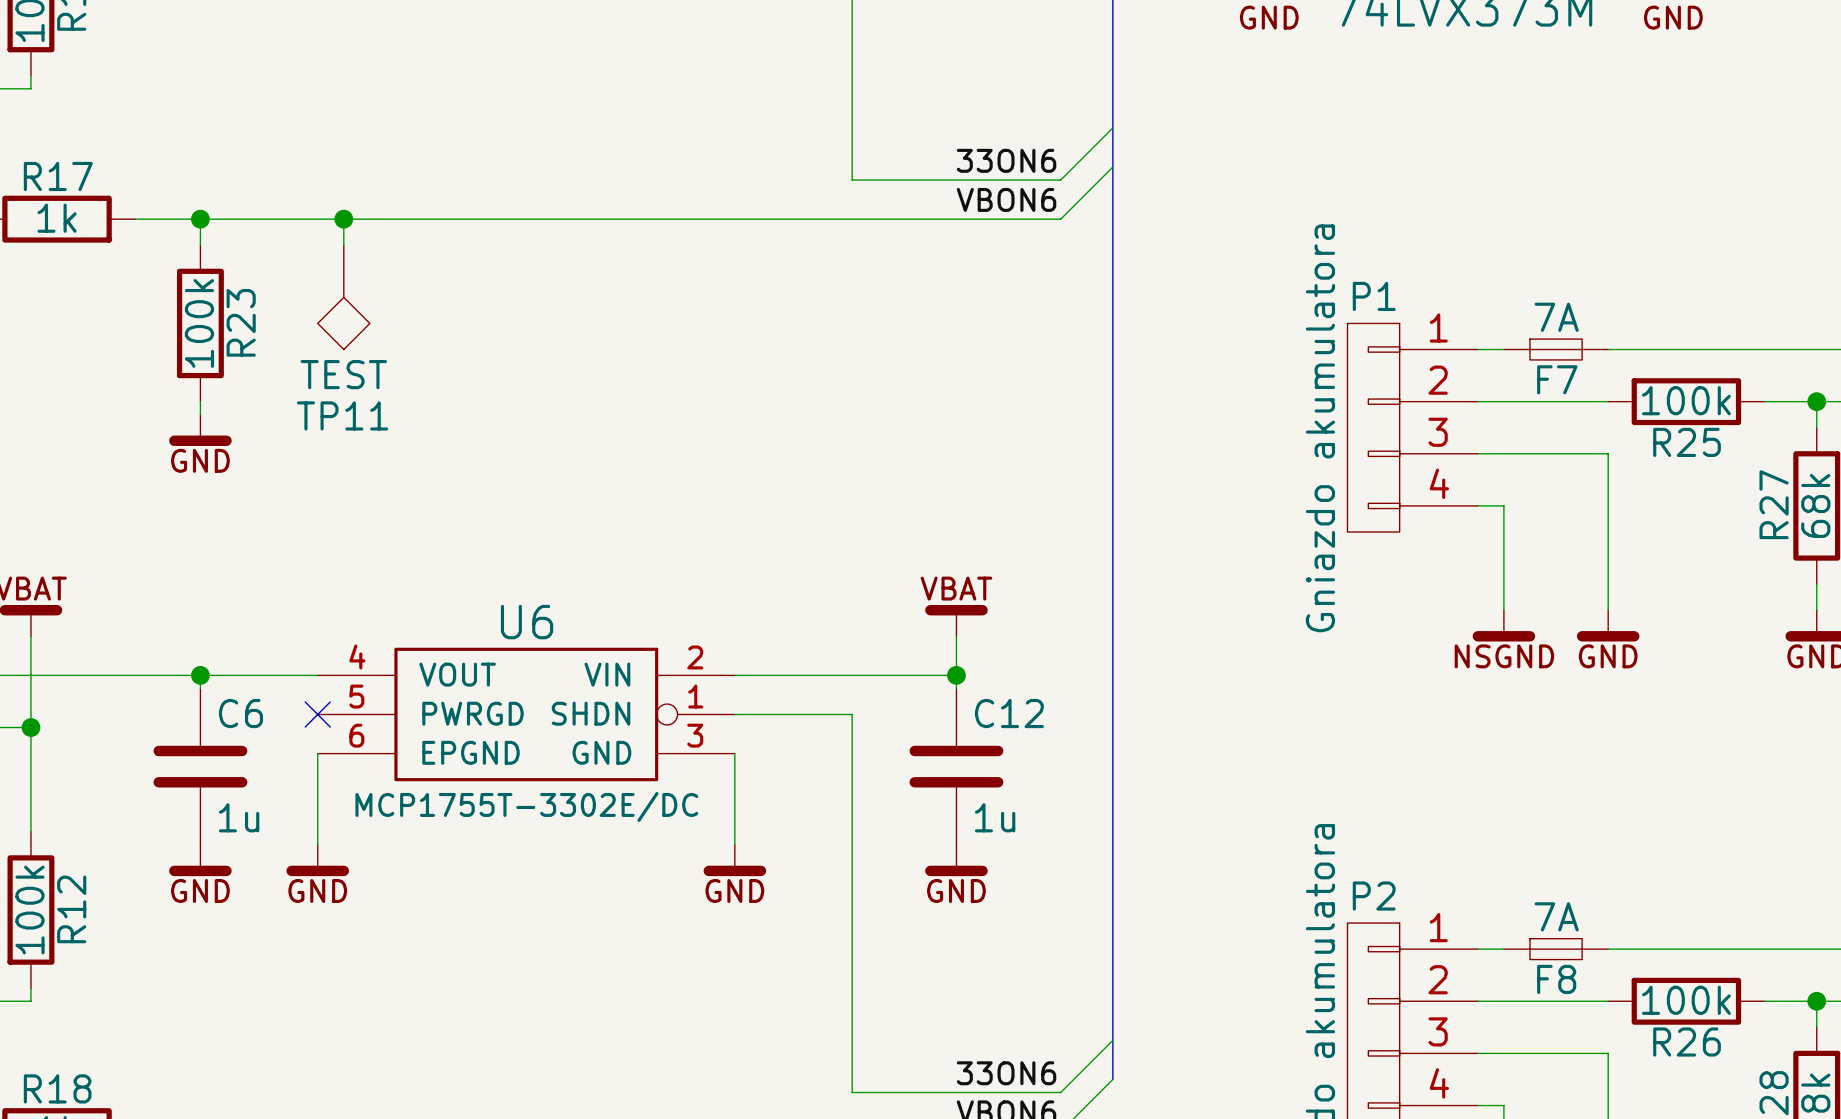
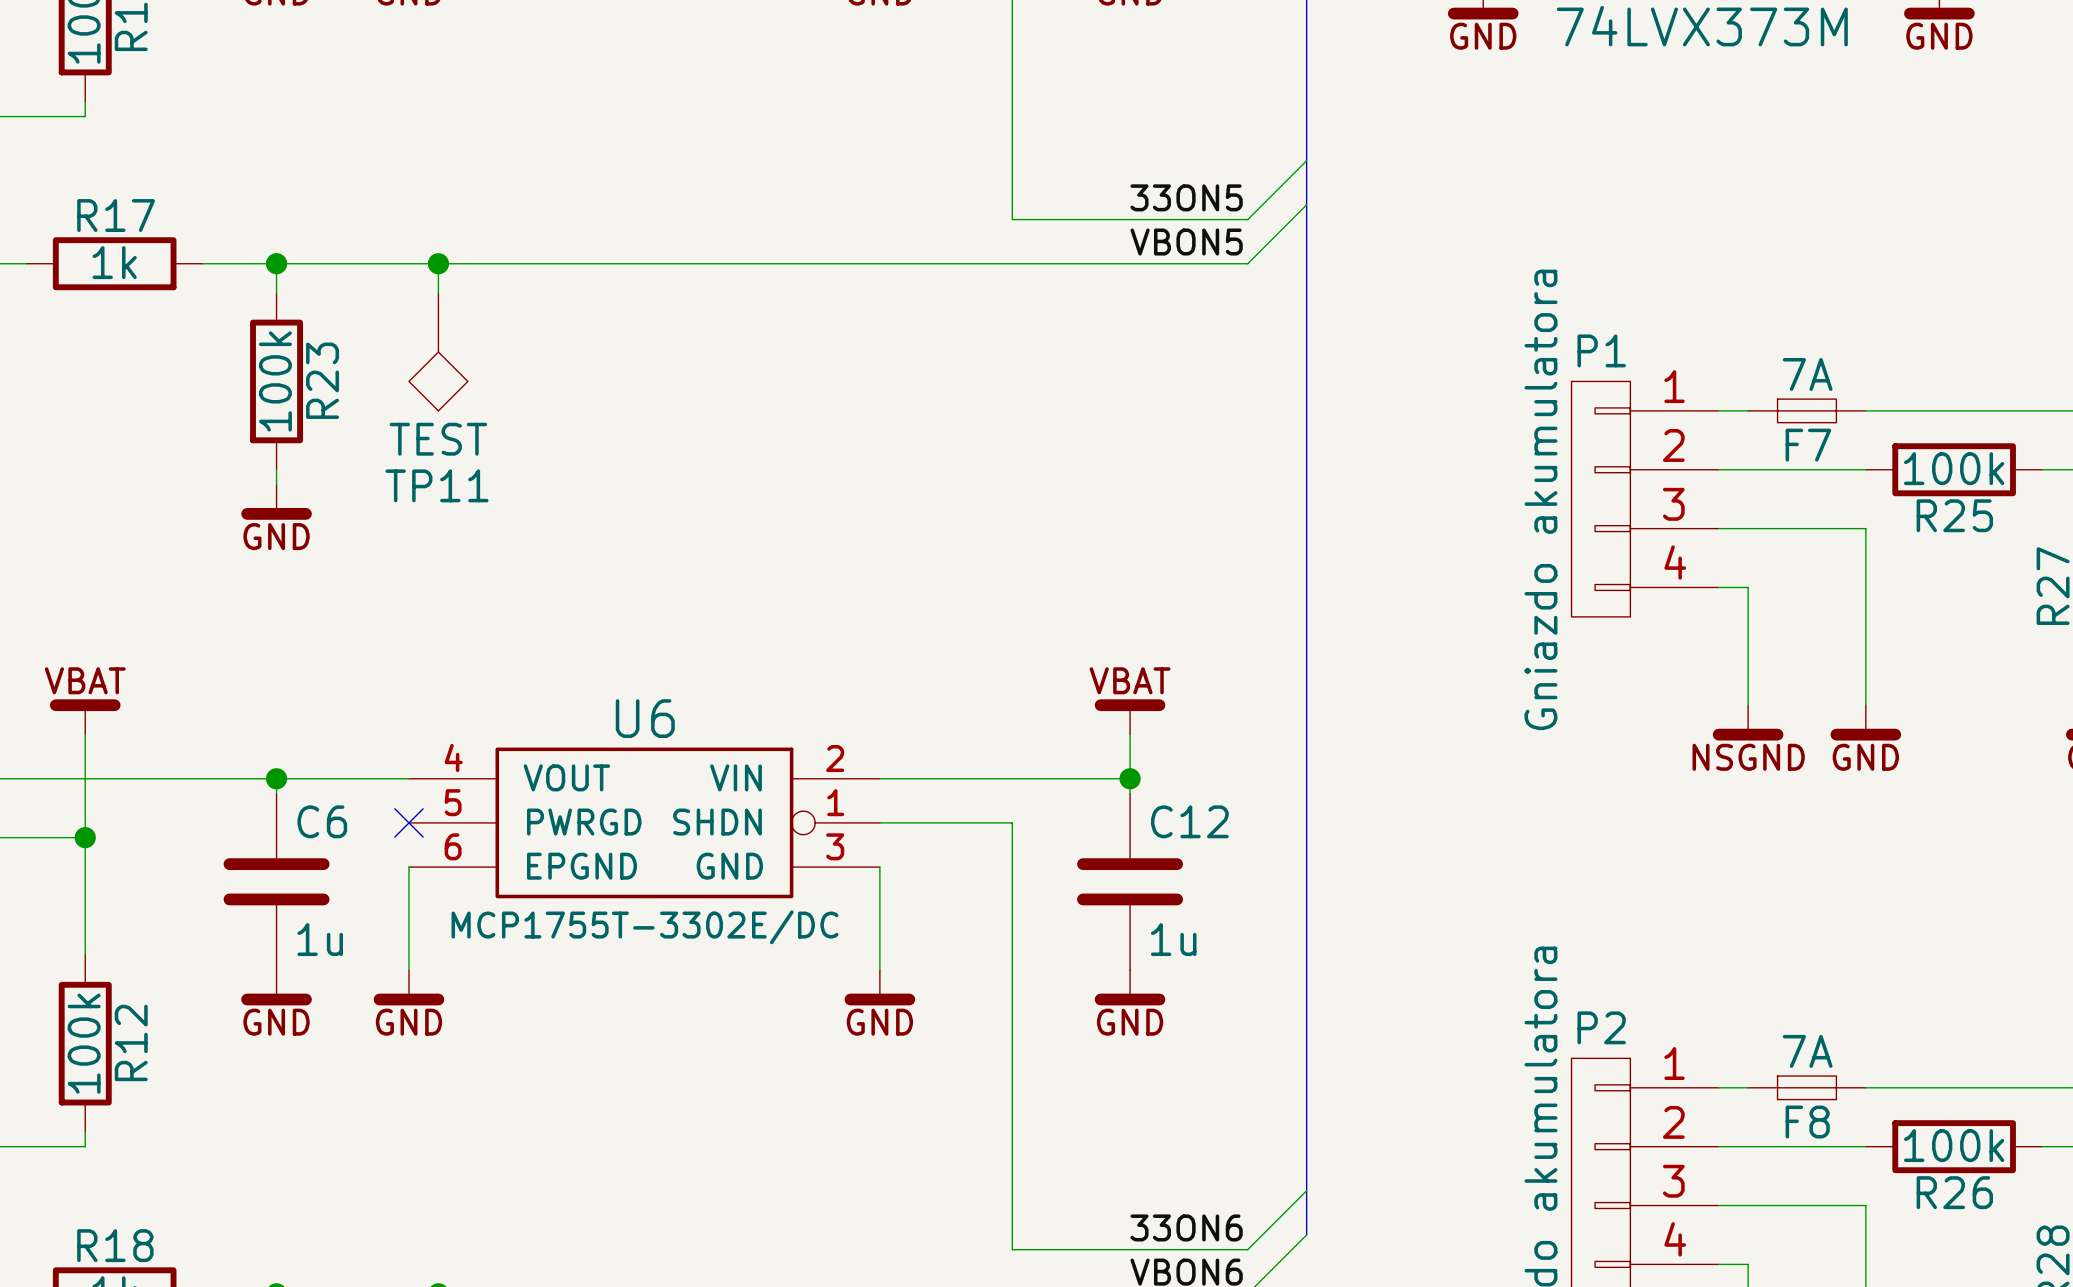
label: 33ON6 (1006, 160) -> 33ON5 (1186, 197)
label: VBON6 (1006, 199) -> VBON5 (1186, 242)

